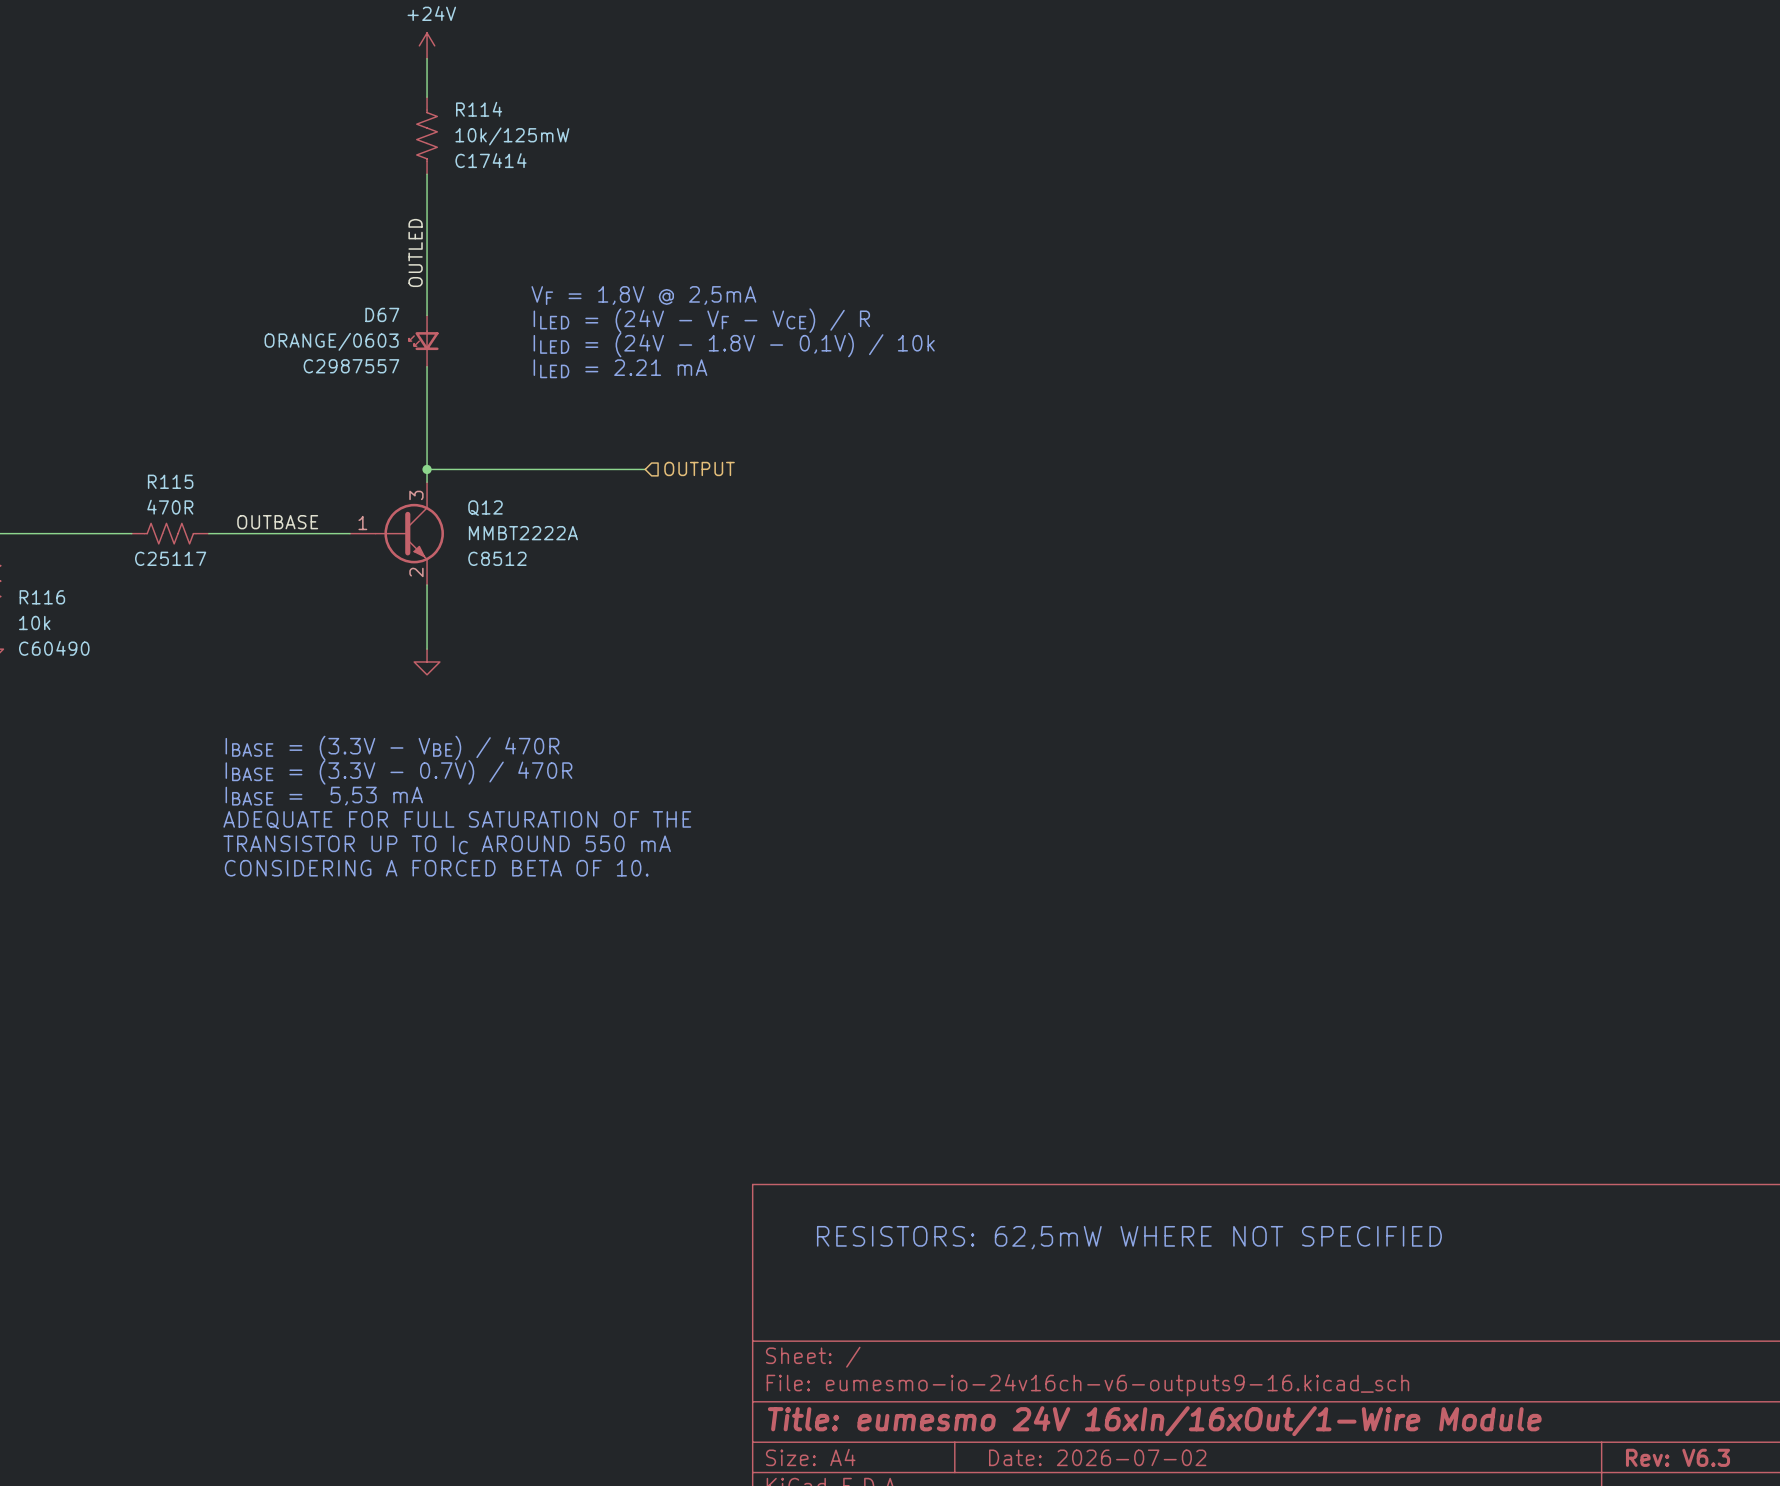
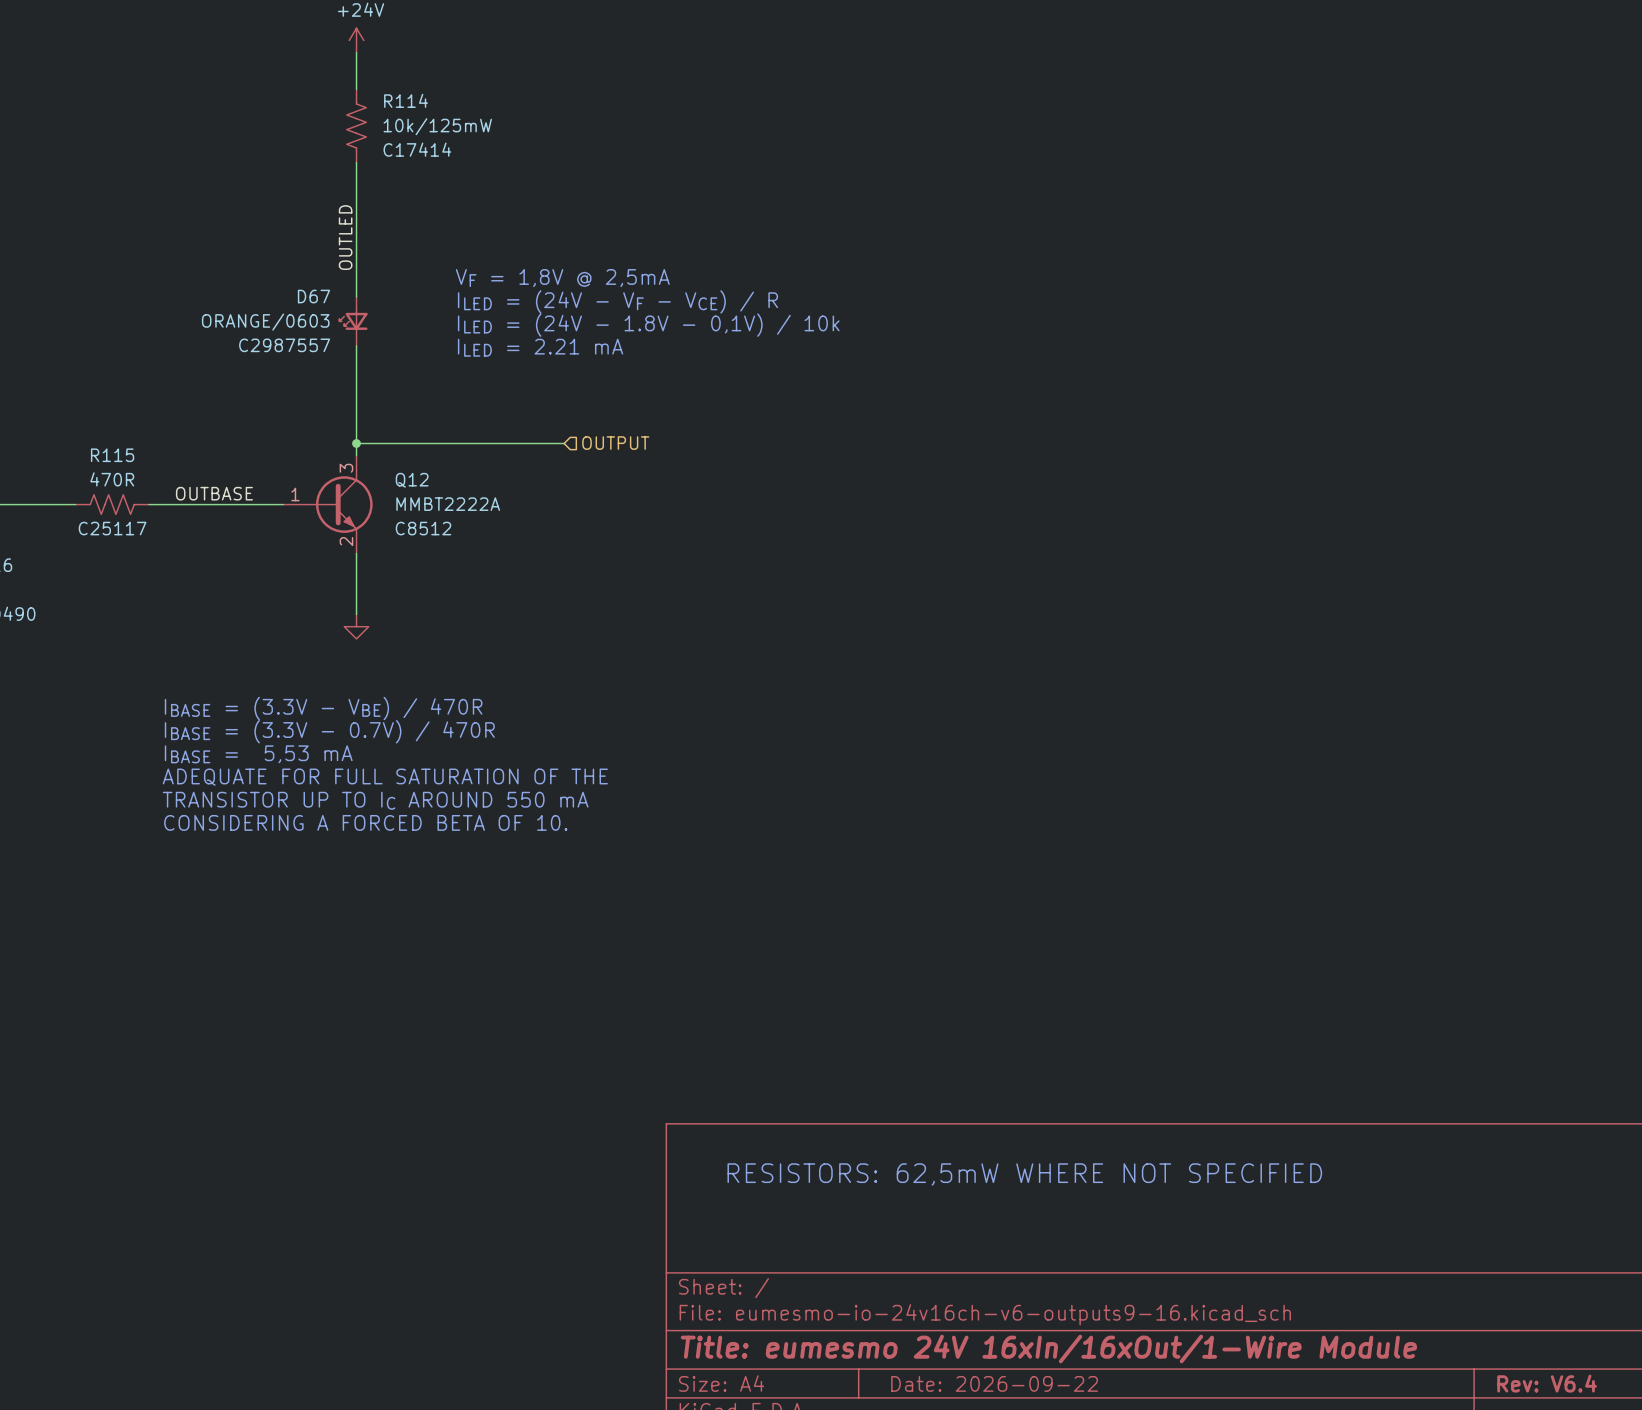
title block: Date: 2026-07-02 (1097, 1457) -> Date: 2026-09-22 (994, 1383)
title block: Rev: V6.3 (1677, 1457) -> Rev: V6.4 (1547, 1383)

